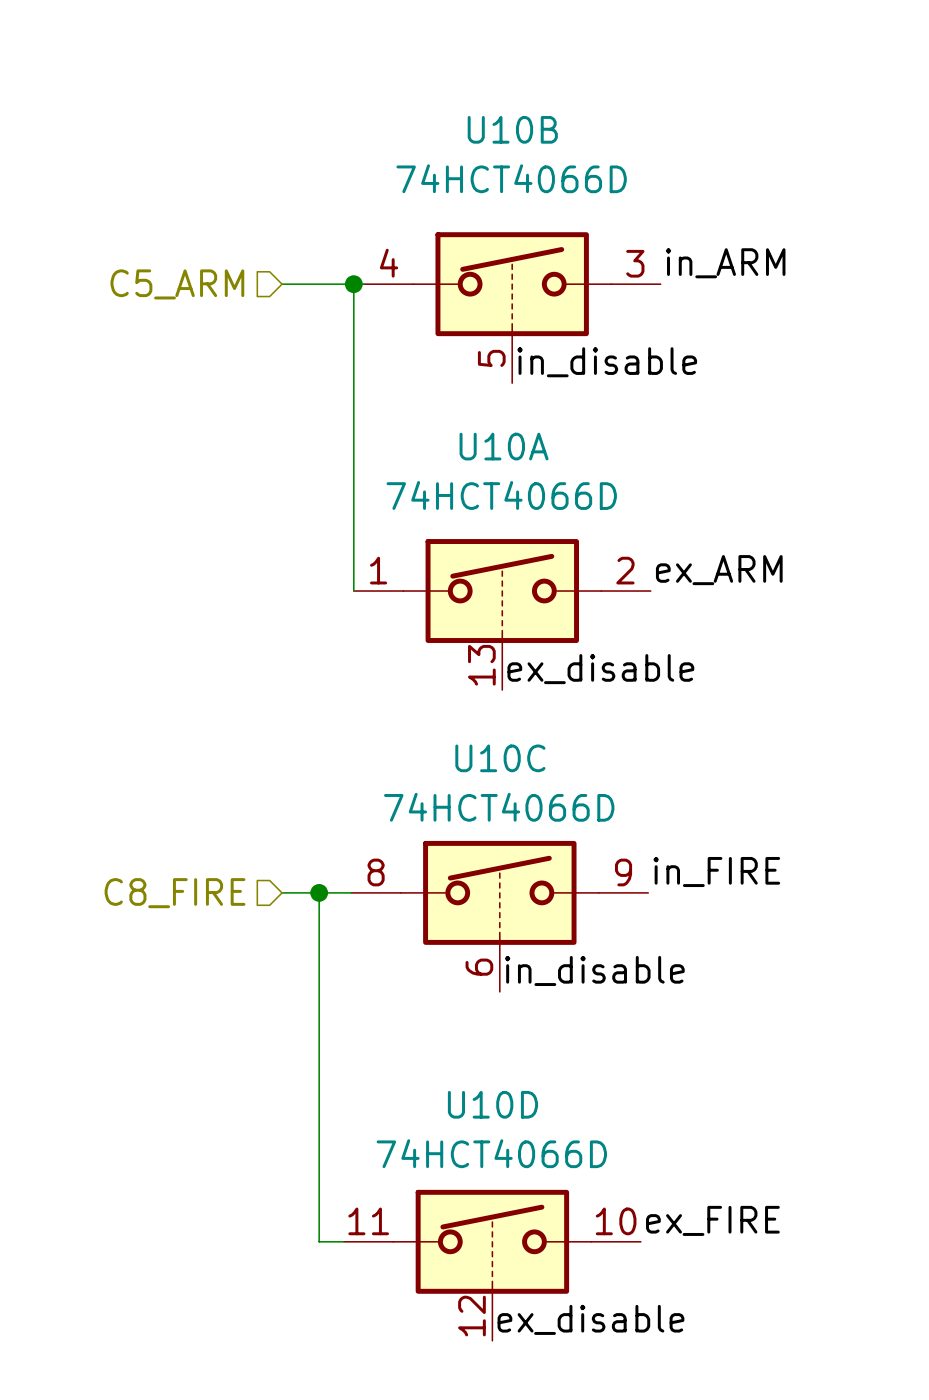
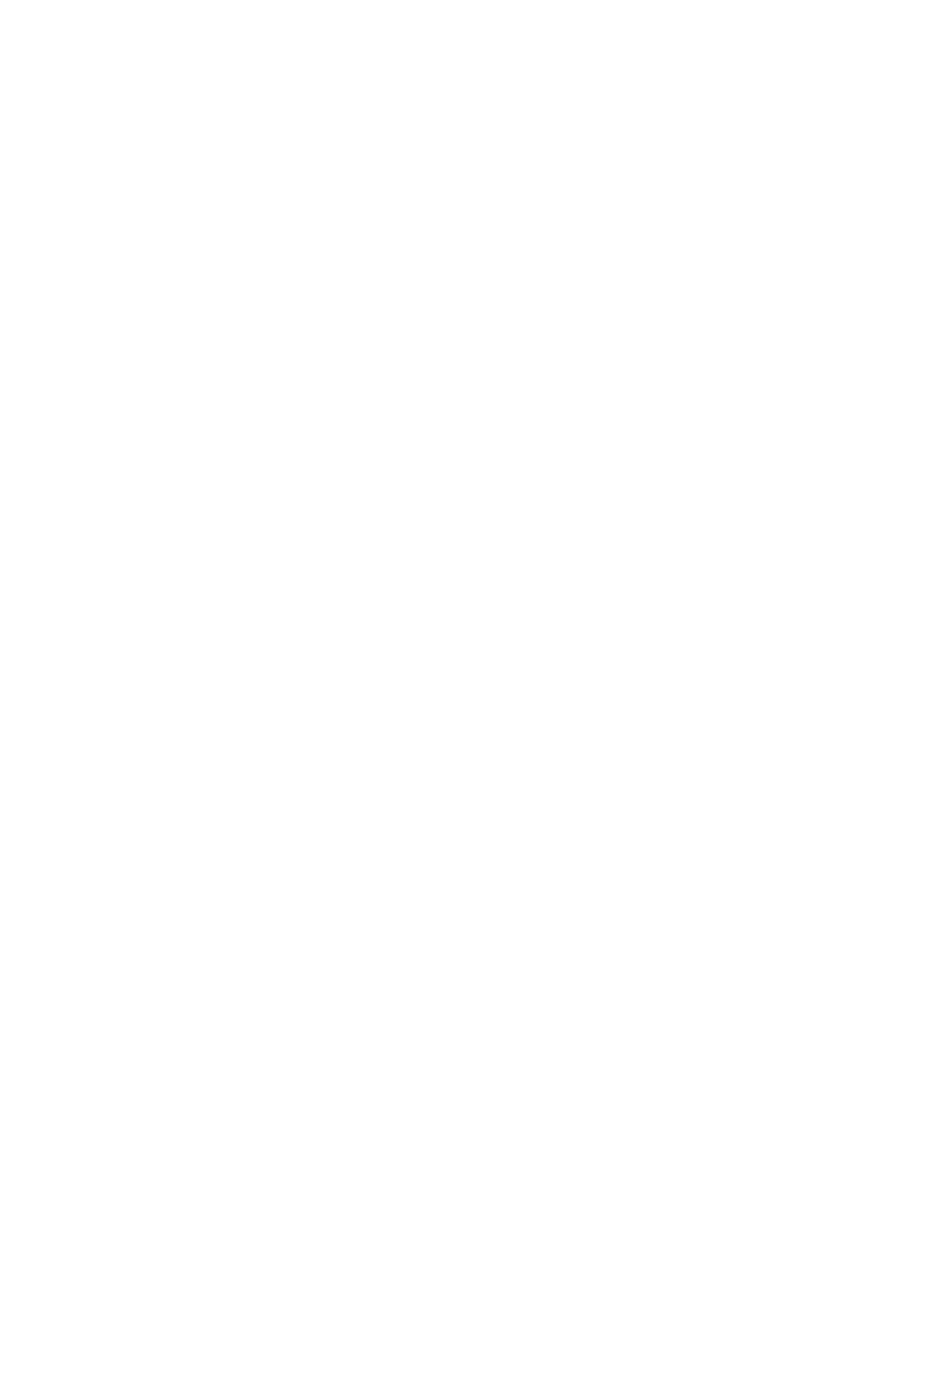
label: in_ARM (725, 263) -> none
hierarchical label: C5_ARM (177, 284) -> none
wire: (282, 284) (363, 284) -> none
wire: (353, 284) (353, 591) -> none
junction: (353, 284) -> none
U10B: 74HCT4066D (512, 307) -> none
label: in_disable (607, 362) -> none
label: ex_ARM (719, 570) -> none
U10A: 74HCT4066D (502, 614) -> none
label: ex_disable (600, 669) -> none
label: in_FIRE (716, 872) -> none
wire: (282, 892) (351, 892) -> none
wire: (319, 892) (319, 1241) (343, 1241) -> none
junction: (319, 892) -> none
hierarchical label: C8_FIRE (175, 893) -> none
U10C: 74HCT4066D (499, 916) -> none
label: in_disable (594, 970) -> none
label: ex_FIRE (712, 1220) -> none
U10D: 74HCT4066D (492, 1265) -> none
label: ex_disable (590, 1319) -> none

